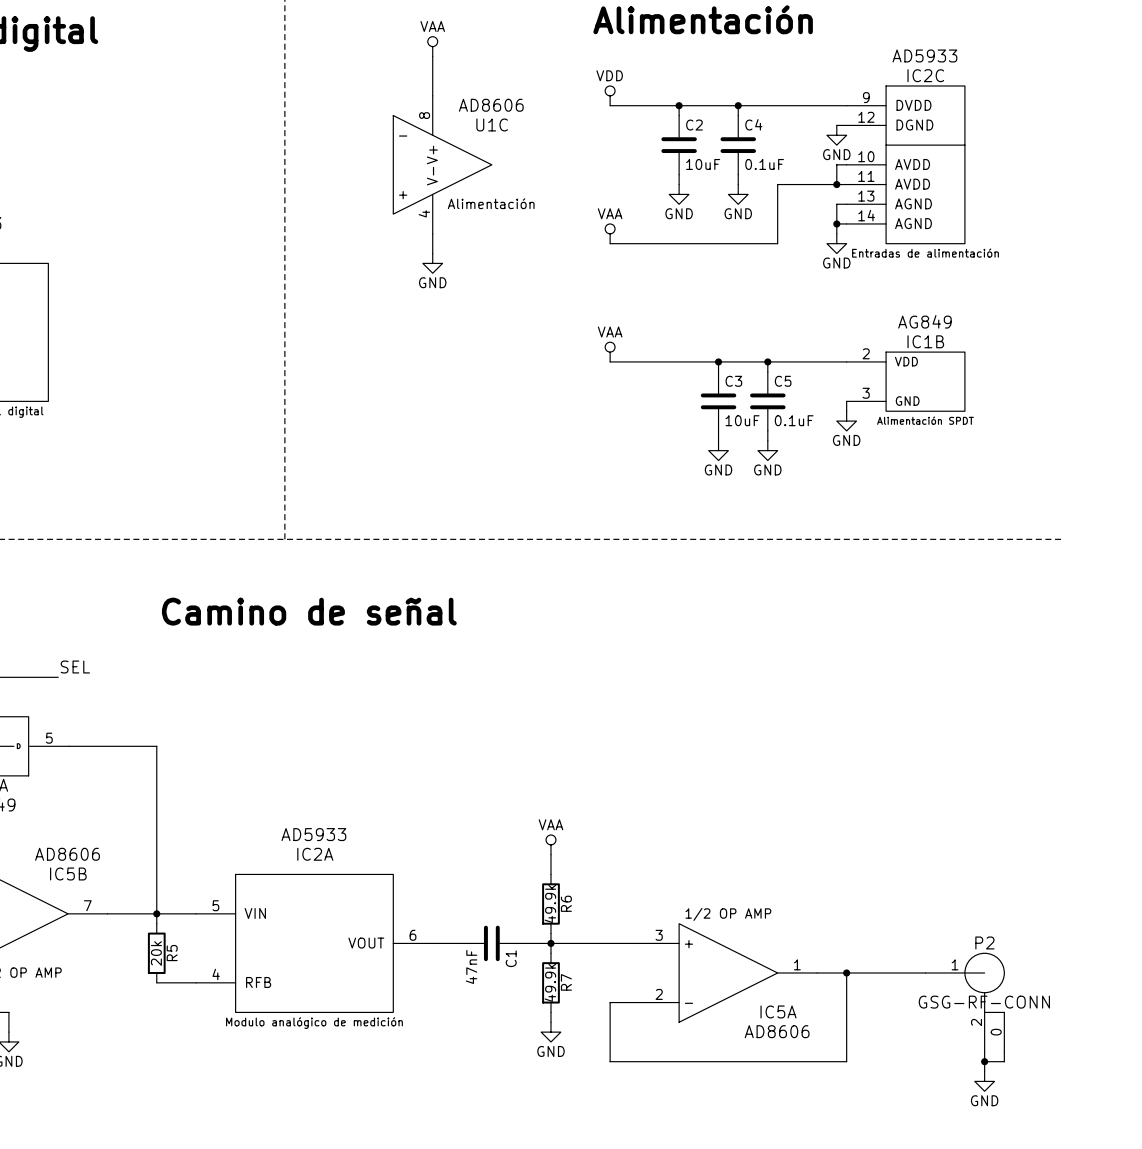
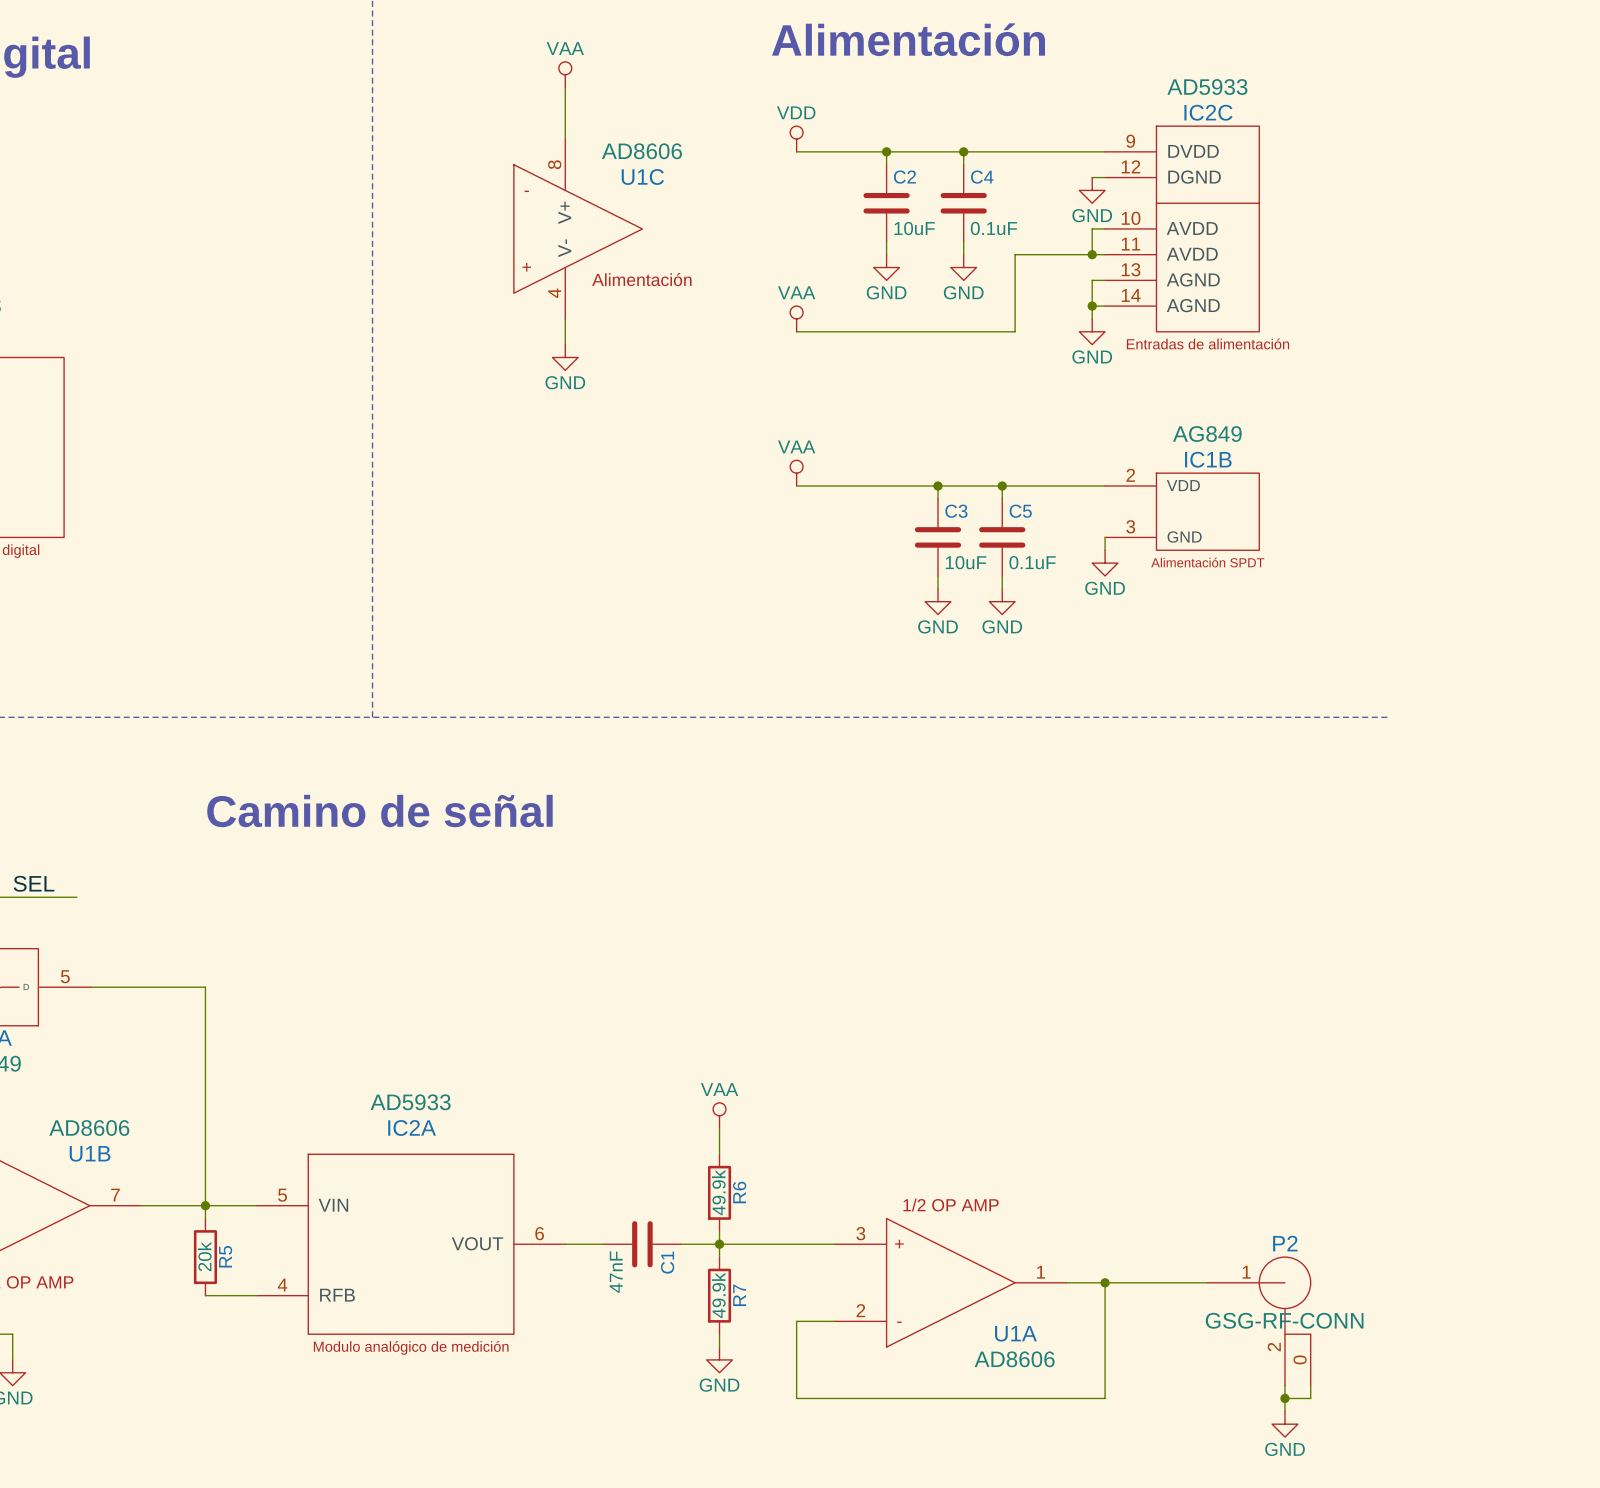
label position: SEL (75, 667) -> SEL (34, 883)
IC5B name: IC5B (68, 873) -> U1B (90, 1153)
IC5A name: IC5A (778, 1011) -> U1A (1015, 1333)

